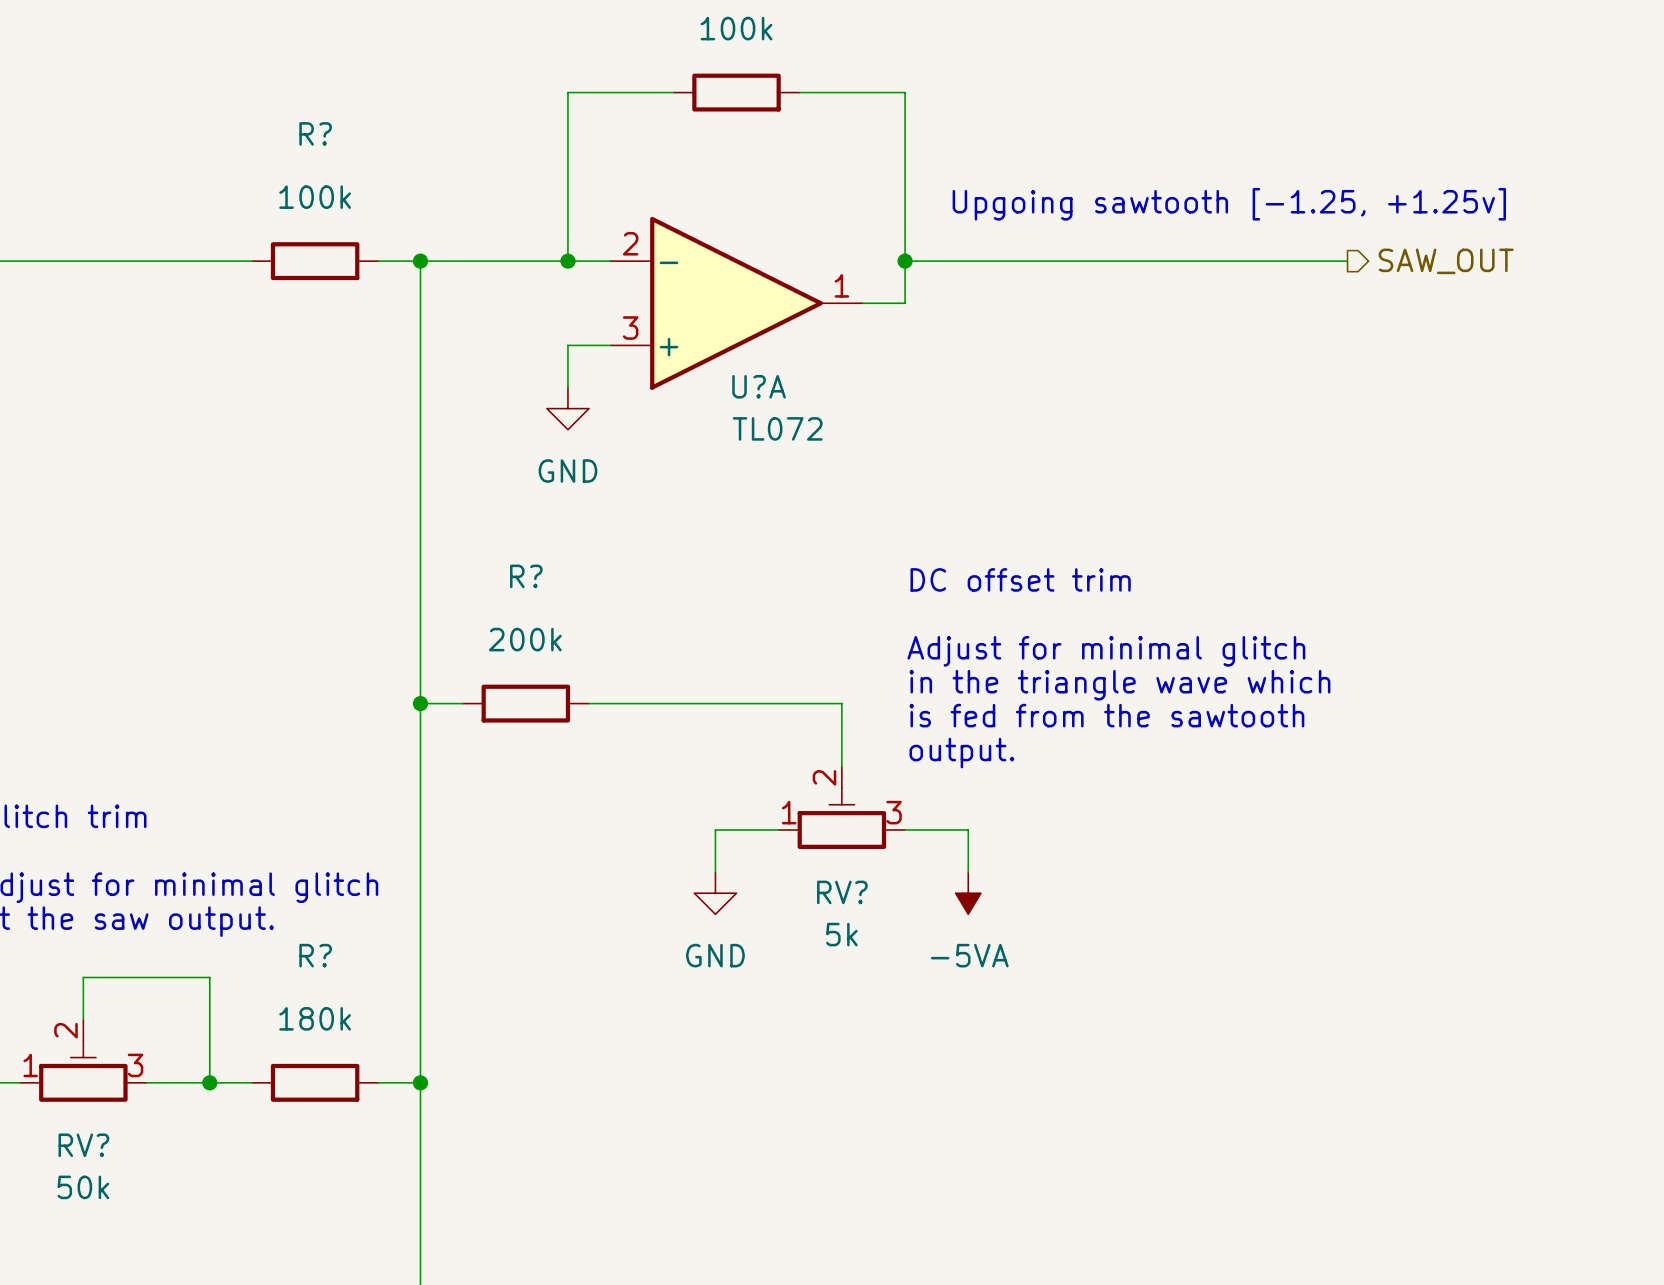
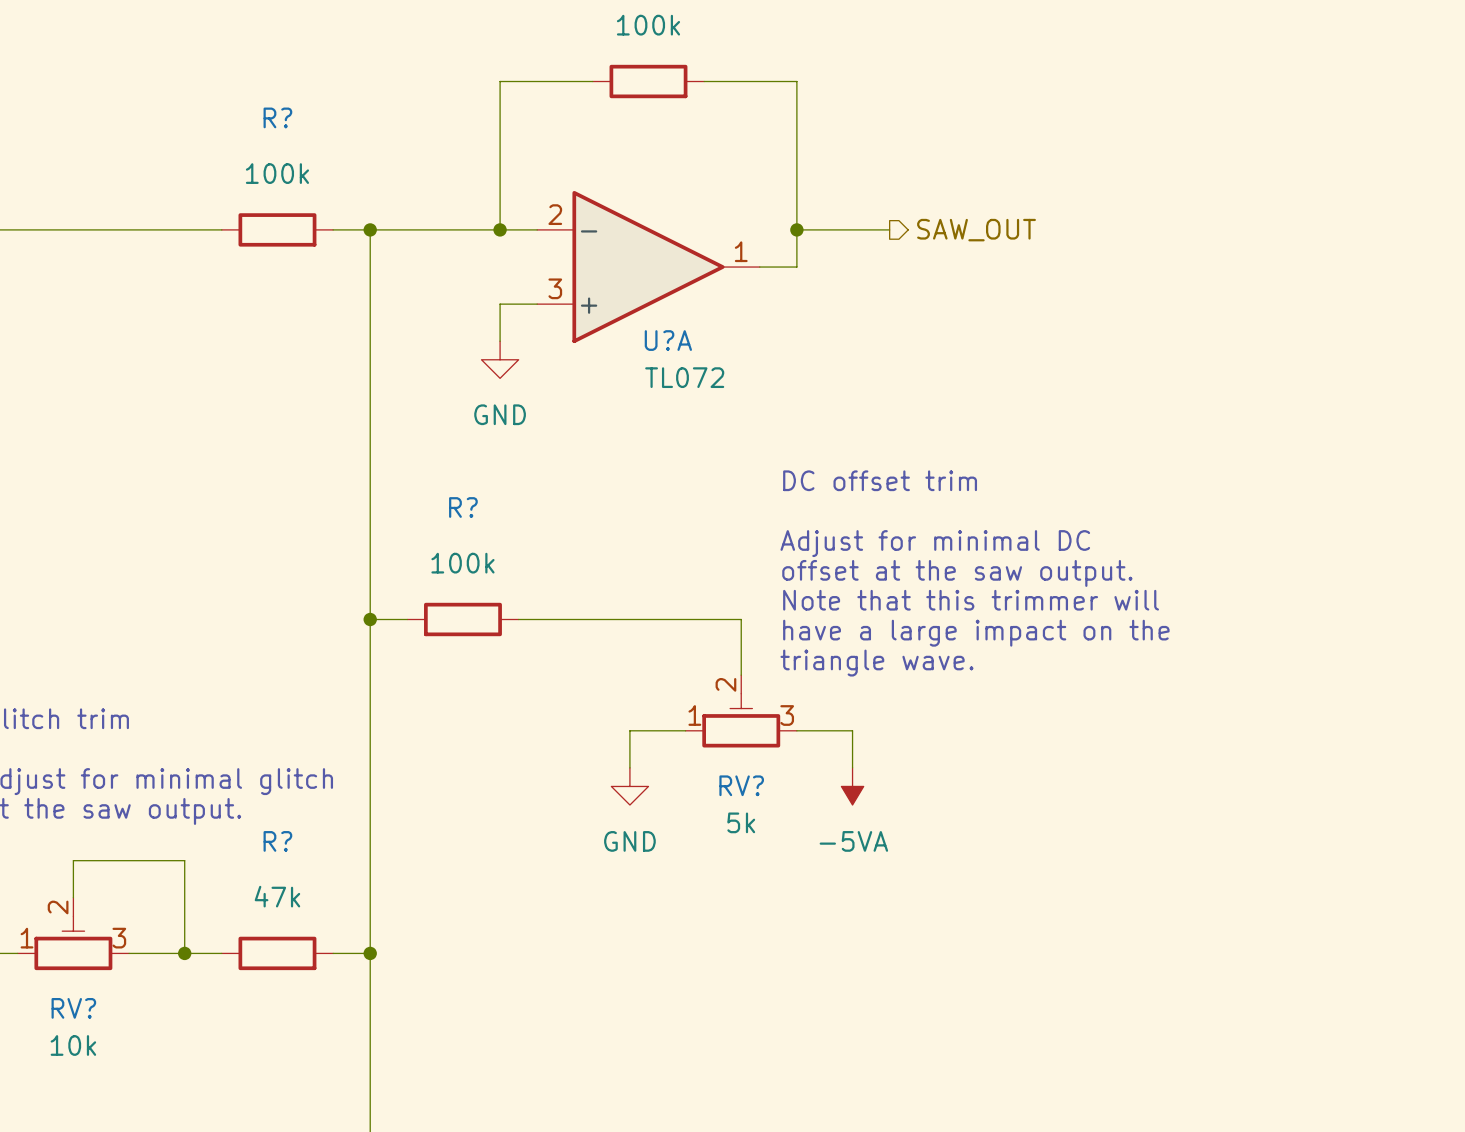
text: Upgoing sawtooth [-1.25, +1.25v] (1229, 204) -> none
wire: (1010, 261) (1347, 261) -> none
hierarchical label position: SAW_OUT (1446, 261) -> SAW_OUT (976, 230)
text position: DC offset trim (1020, 579) -> DC offset trim (880, 480)
R? value: 200k (525, 639) -> 100k (462, 563)
text: none -> offset at the saw output. (957, 573)
text: Adjust for minimal glitch (1106, 651) -> Adjust for minimal DC (935, 543)
text: none -> Note that this trimmer will (971, 600)
text: in the triangle wave which (1119, 685) -> none
text: is fed from the sawtooth (1106, 715) -> none
text: none -> have a large impact on the (976, 633)
text: output. (961, 753) -> none
text: none -> triangle wave. (876, 663)
R? value: 180k (315, 1018) -> 47k (277, 896)
RV? value: 50k (83, 1187) -> 10k (73, 1045)

